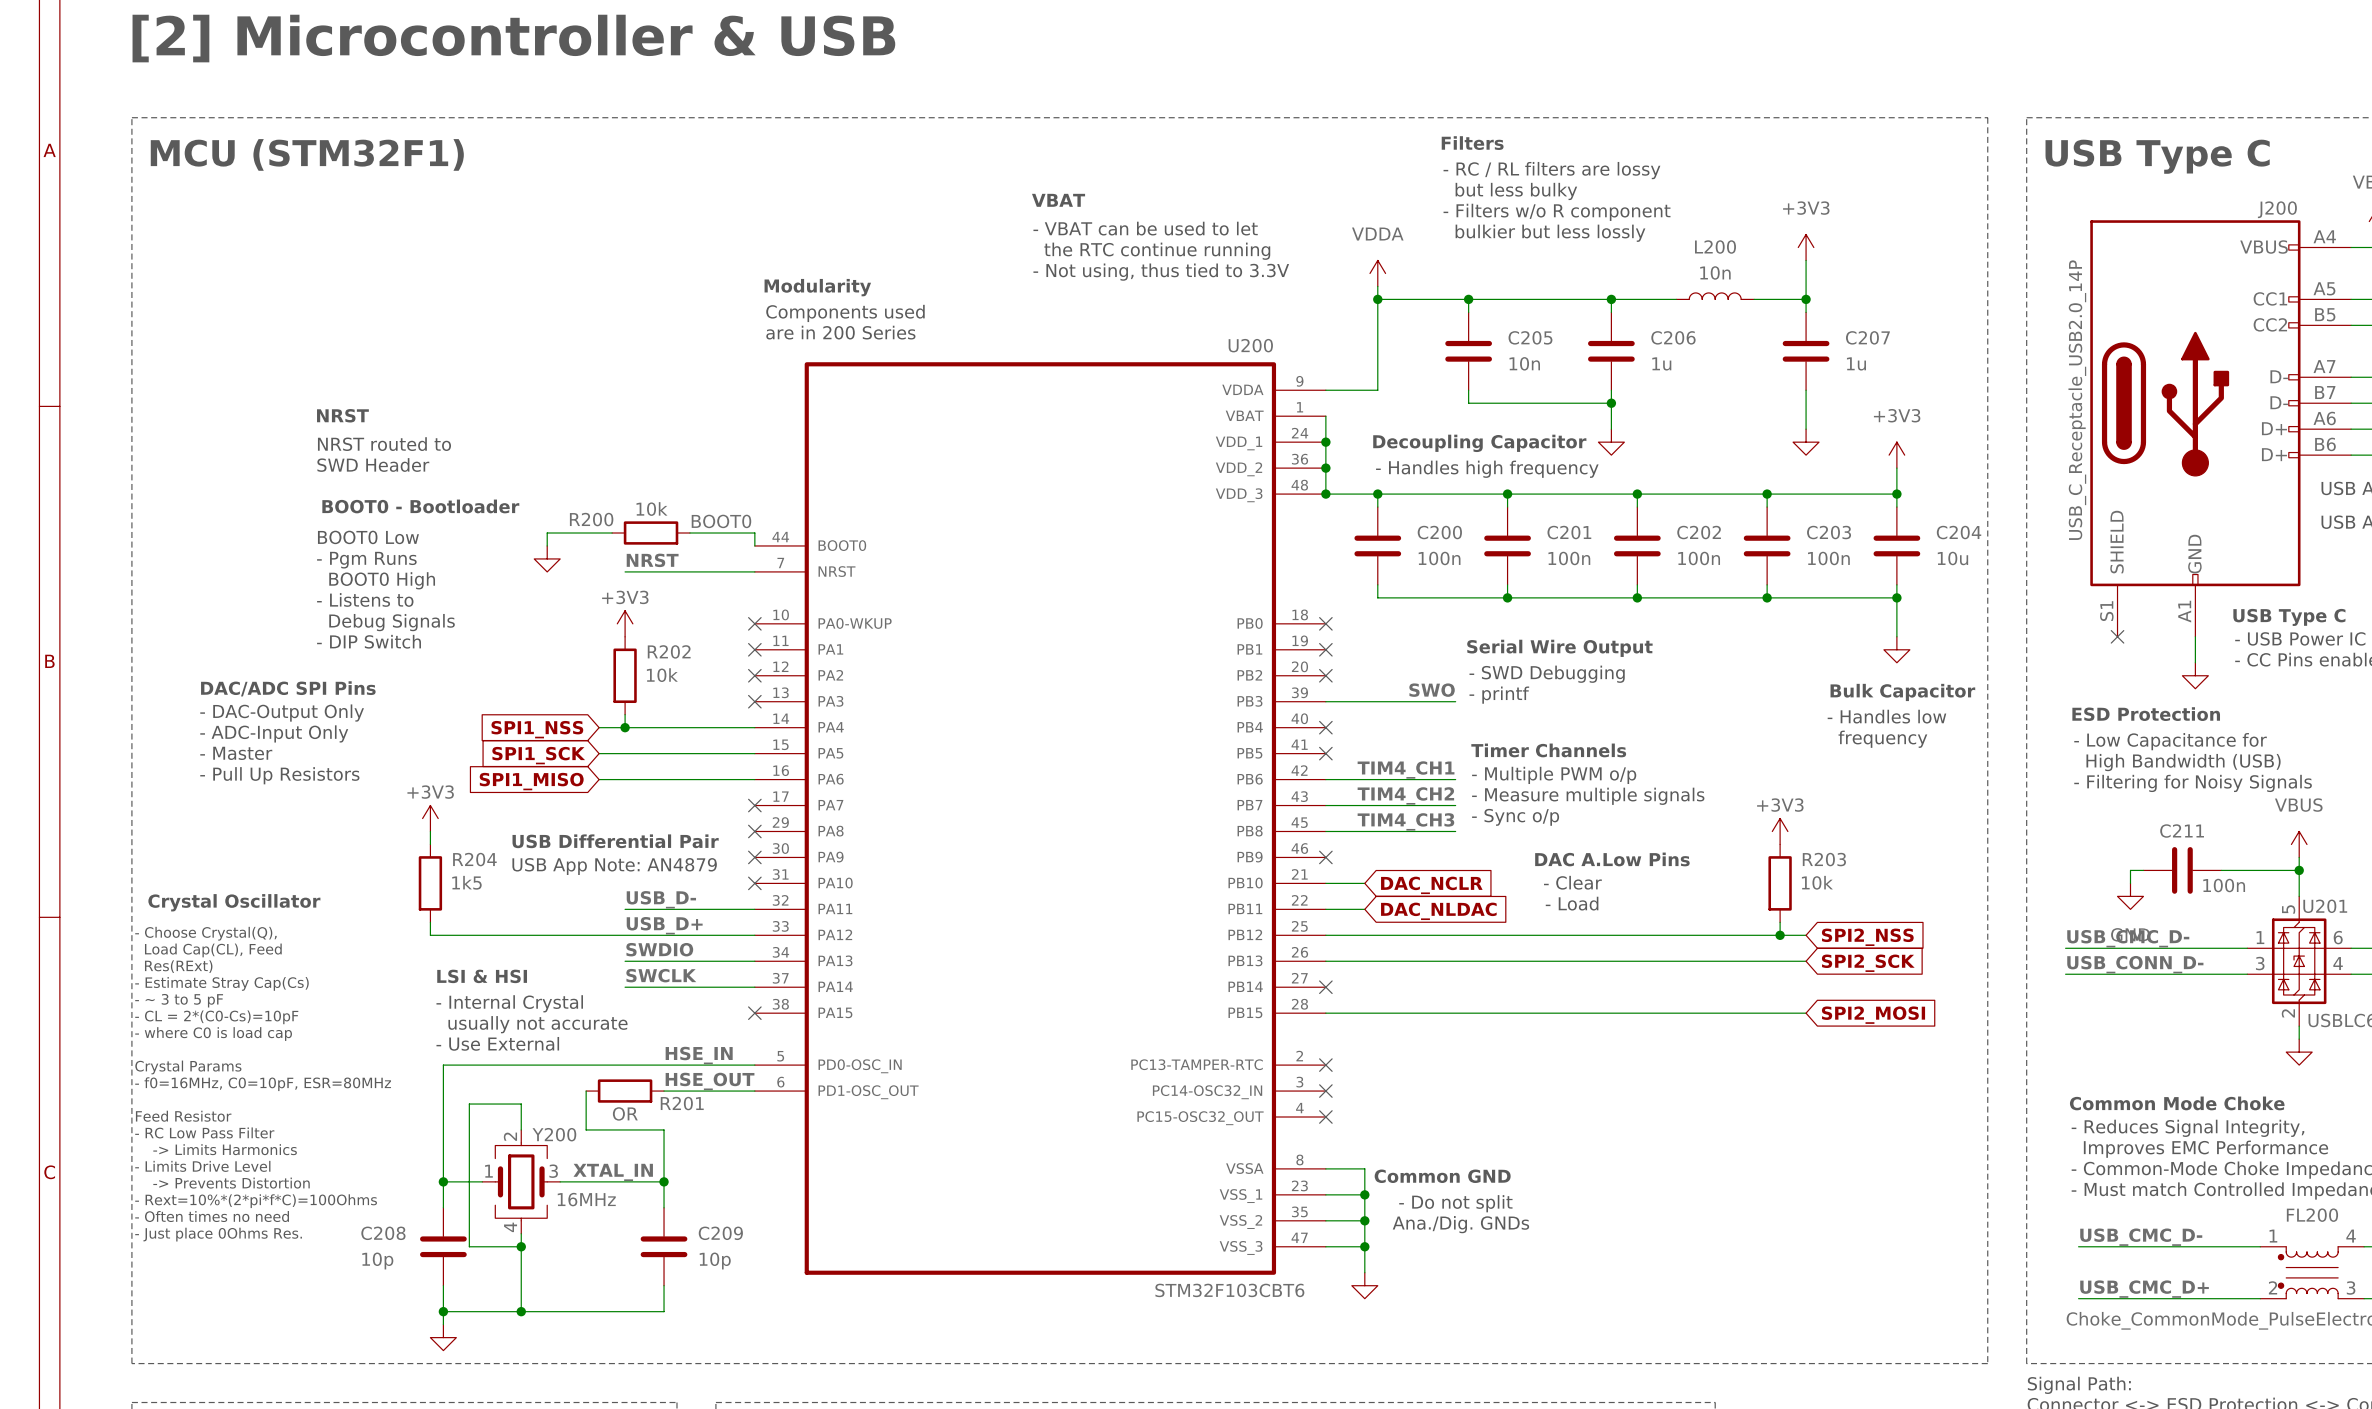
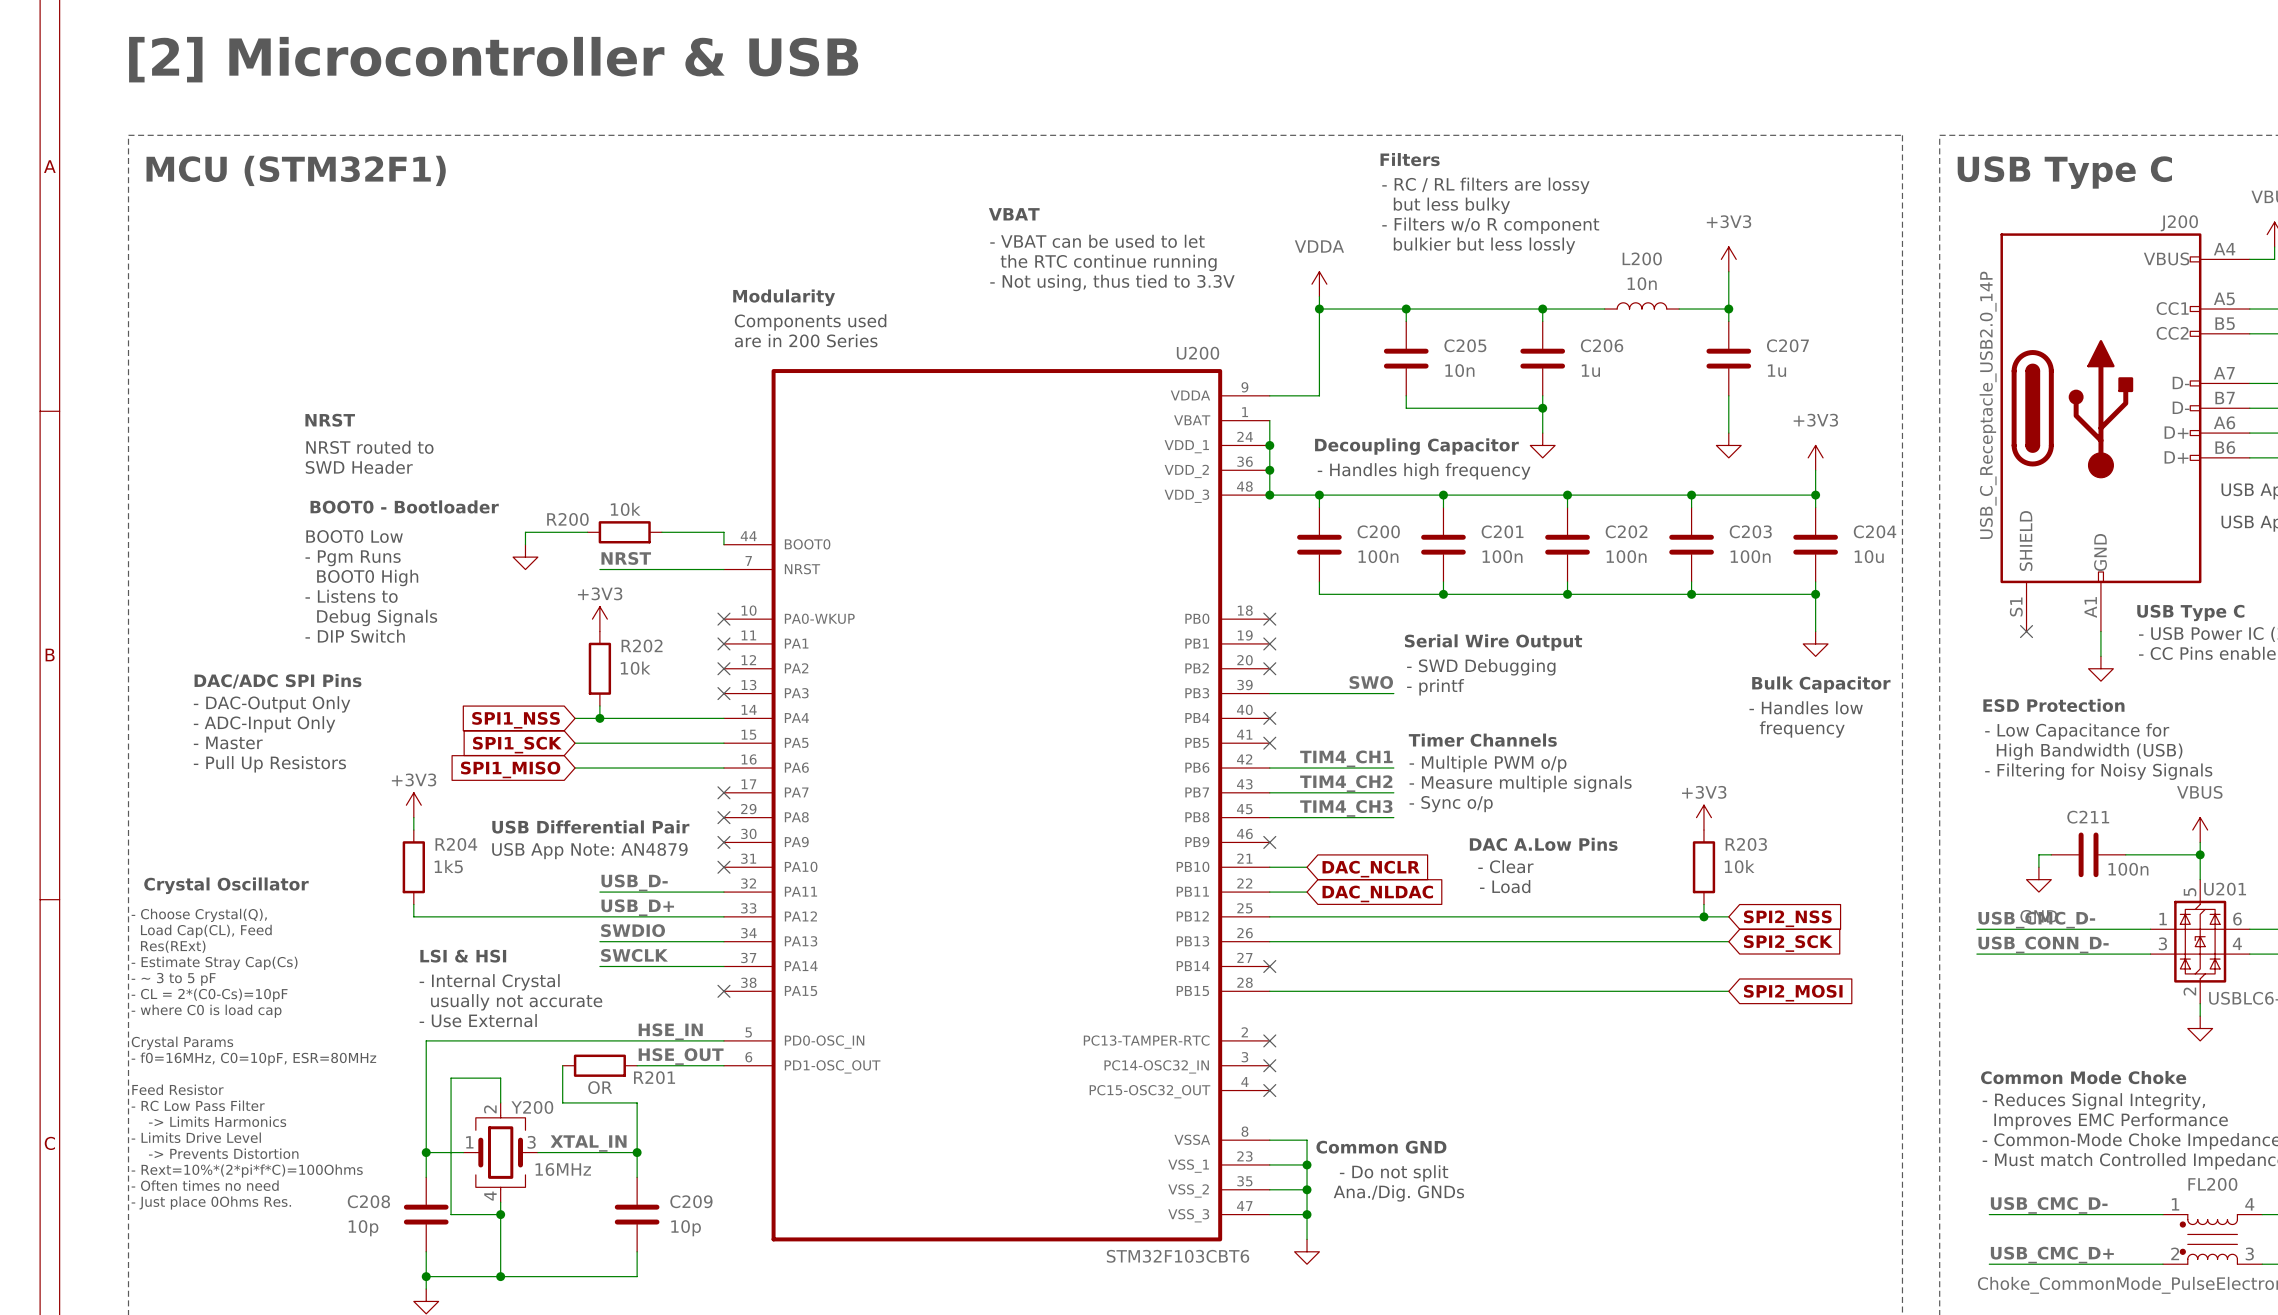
label: BOOT0 (721, 521) -> none

